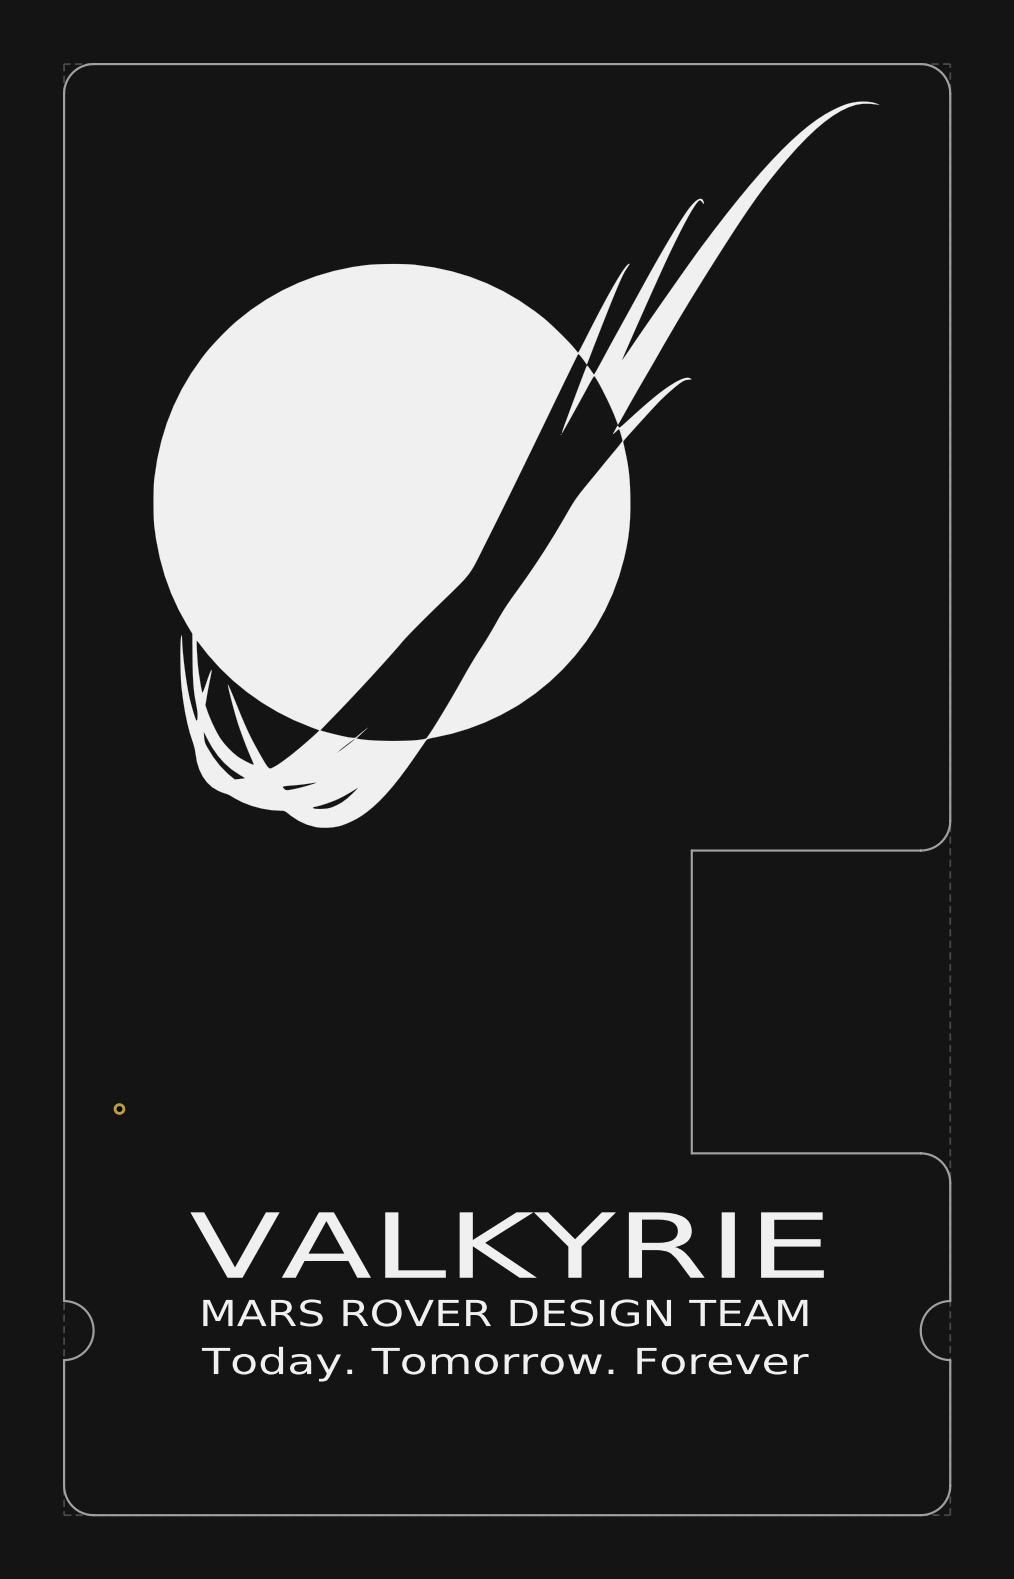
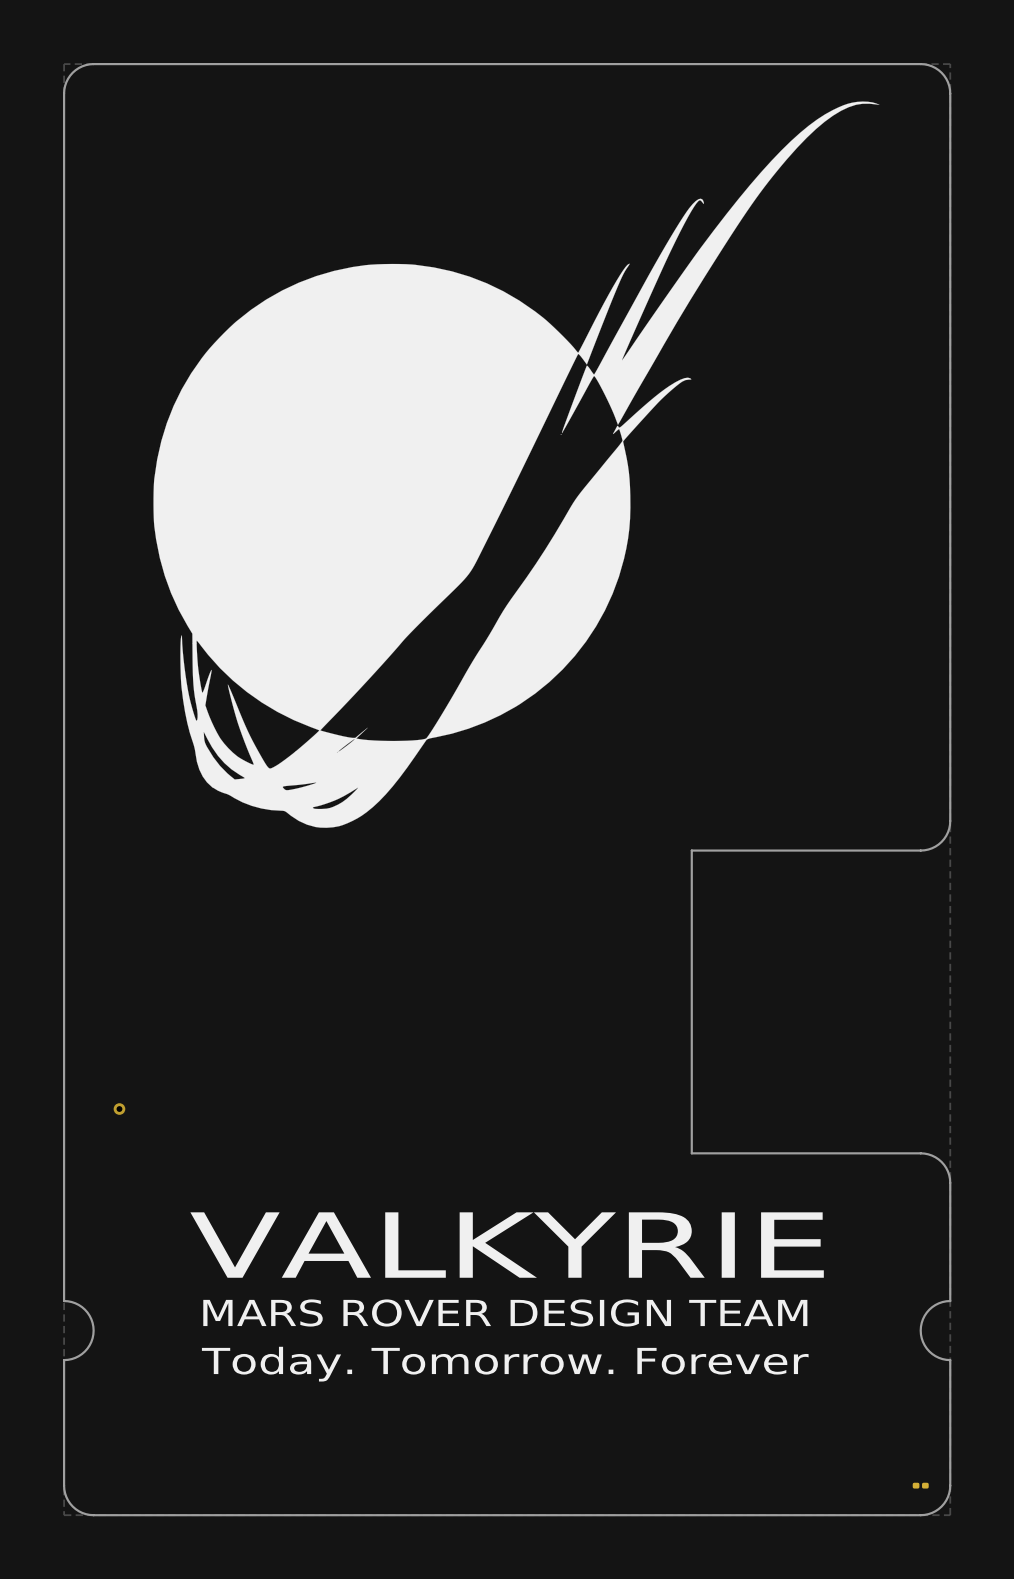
part: none -> (920, 1485)

